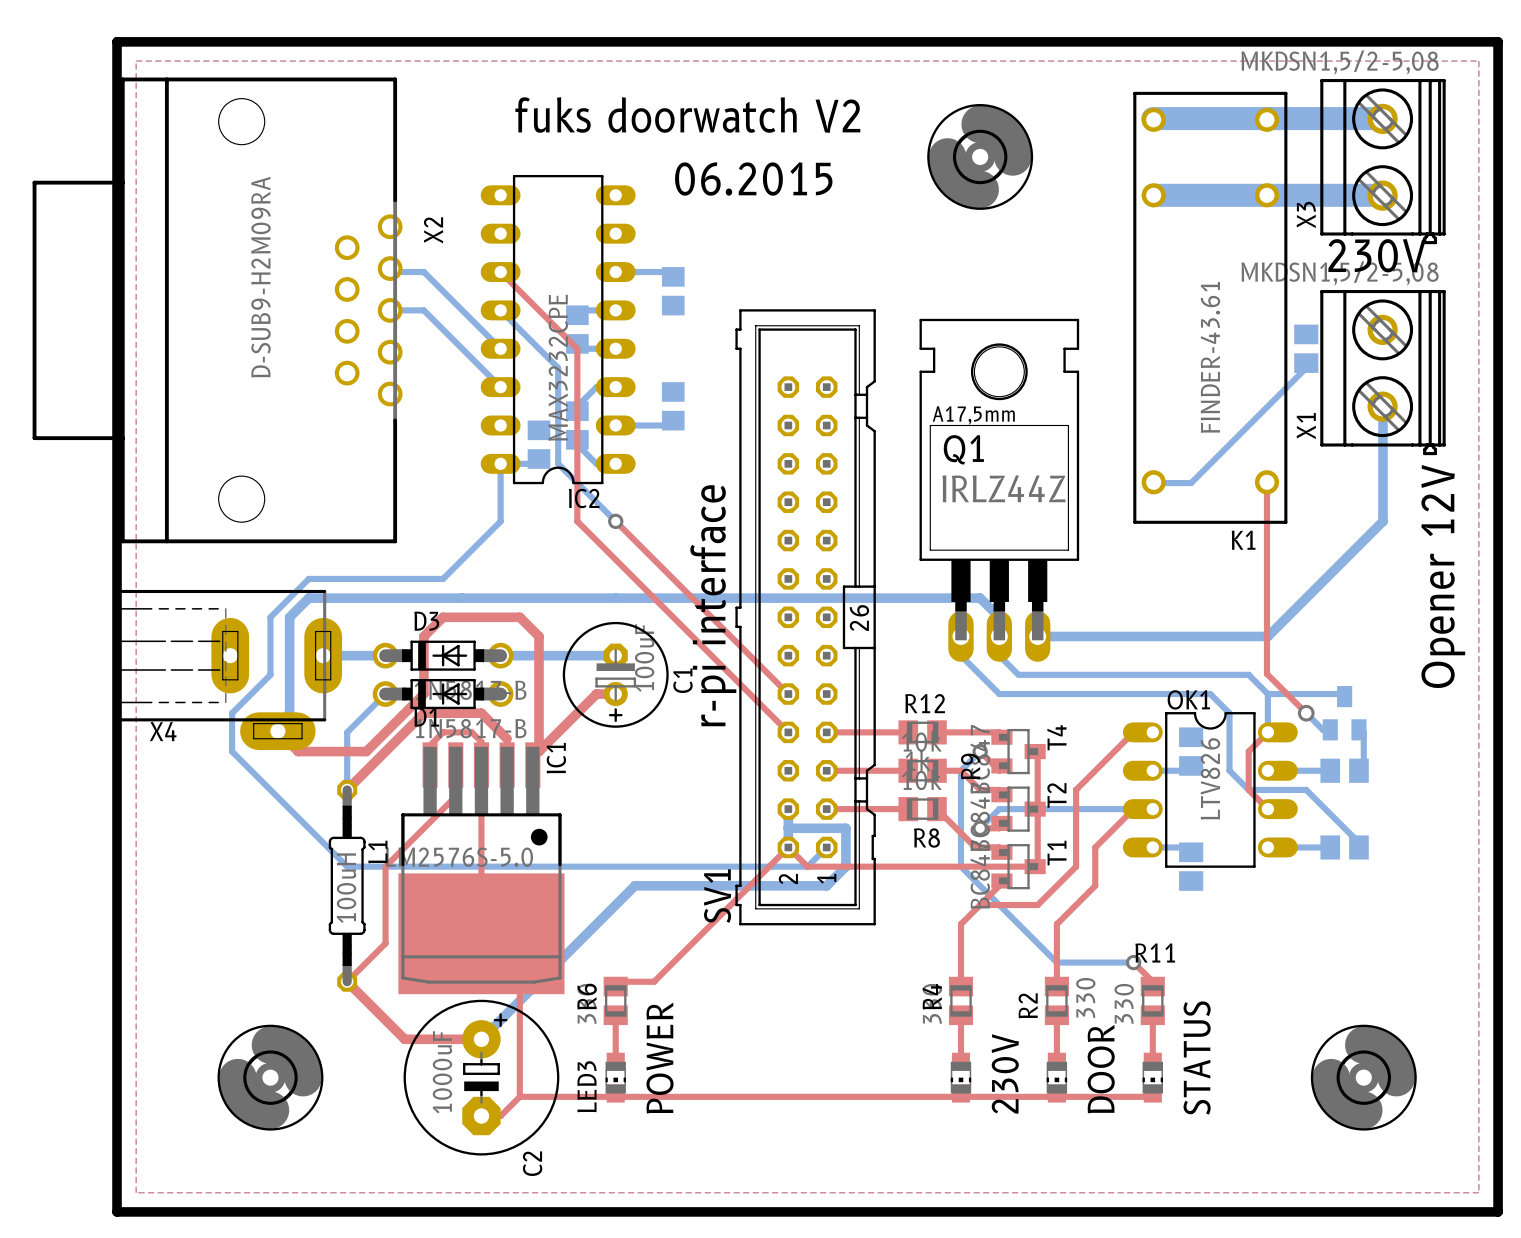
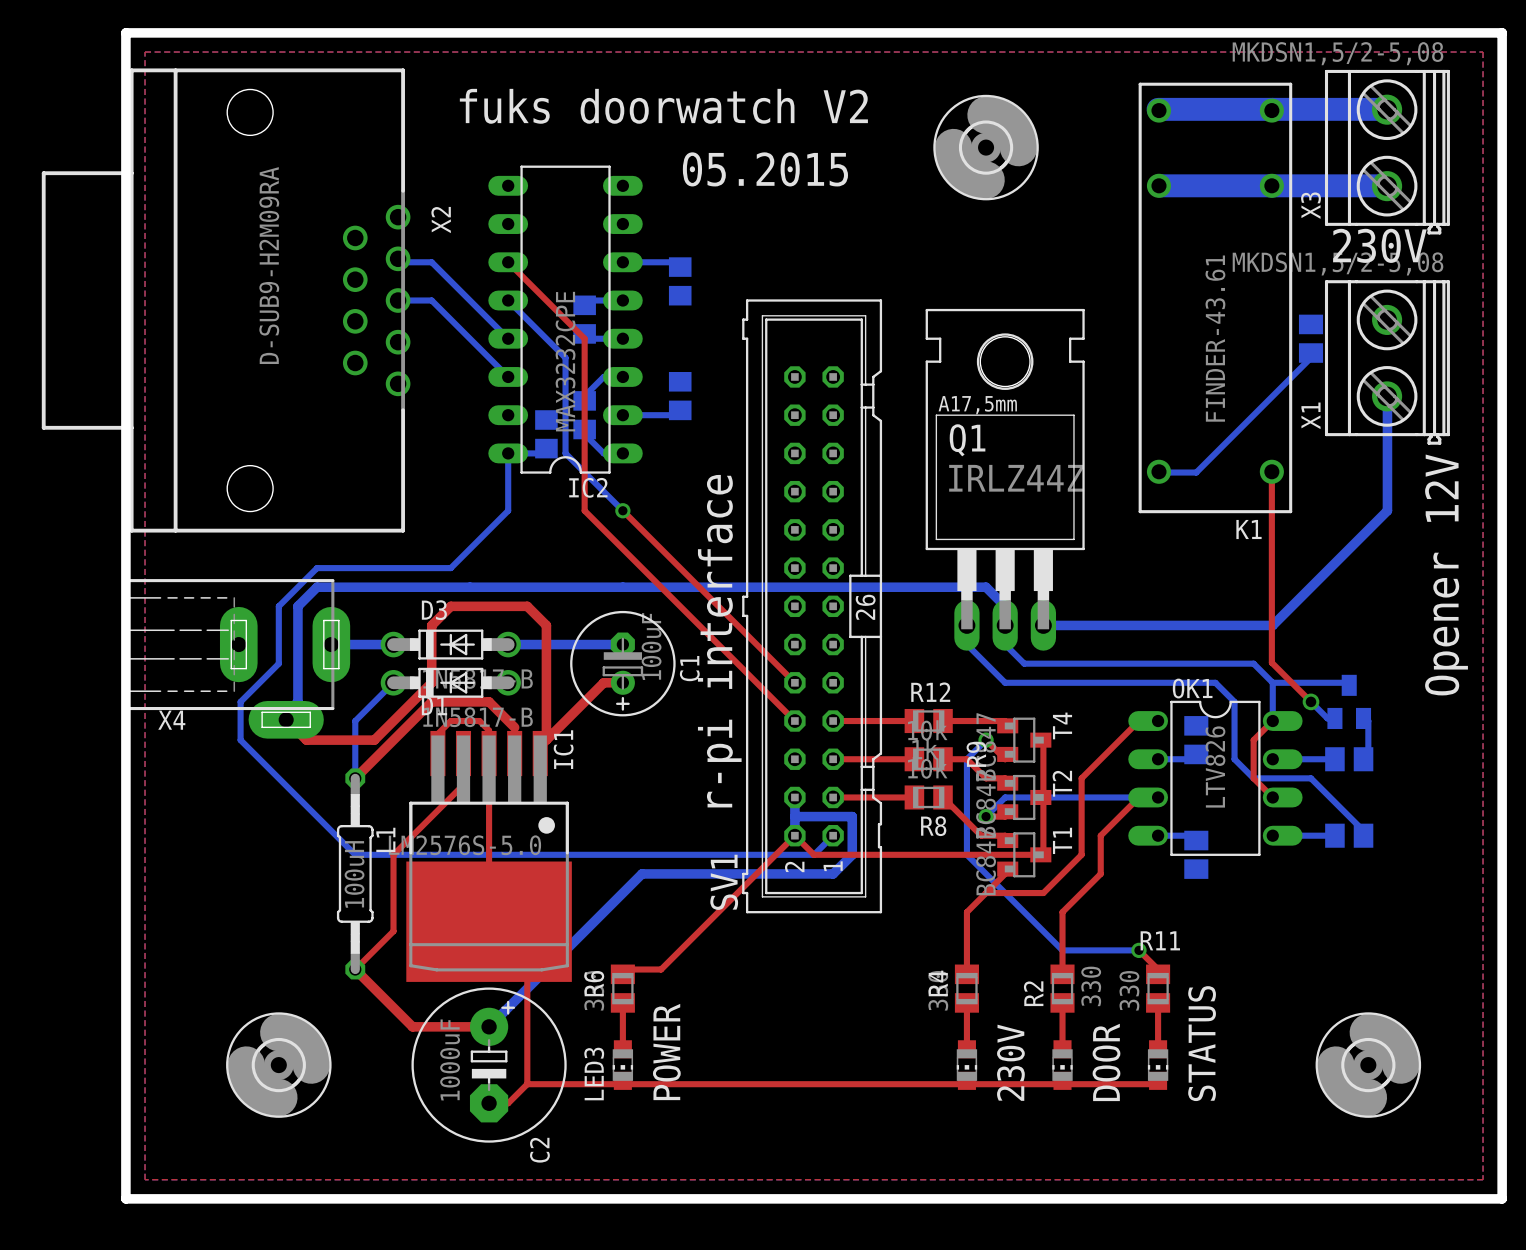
text: 06.2015 (753, 179) -> 05.2015 (765, 169)

